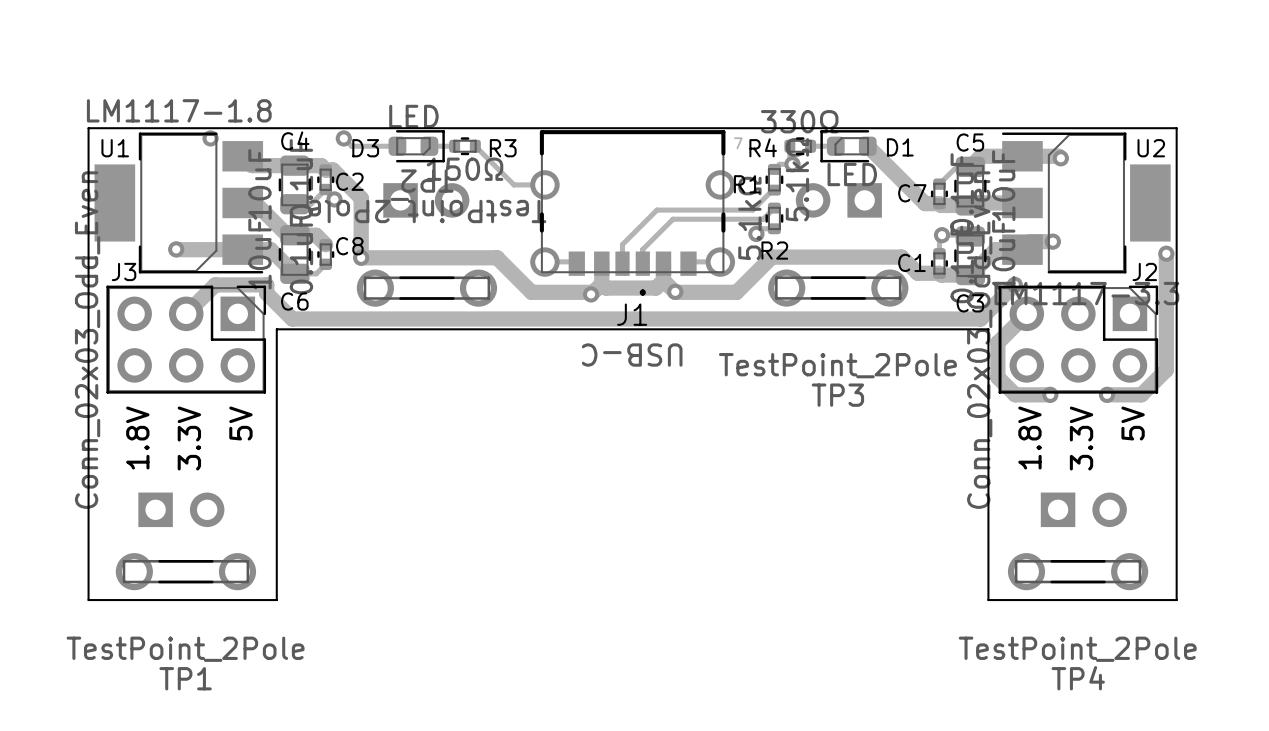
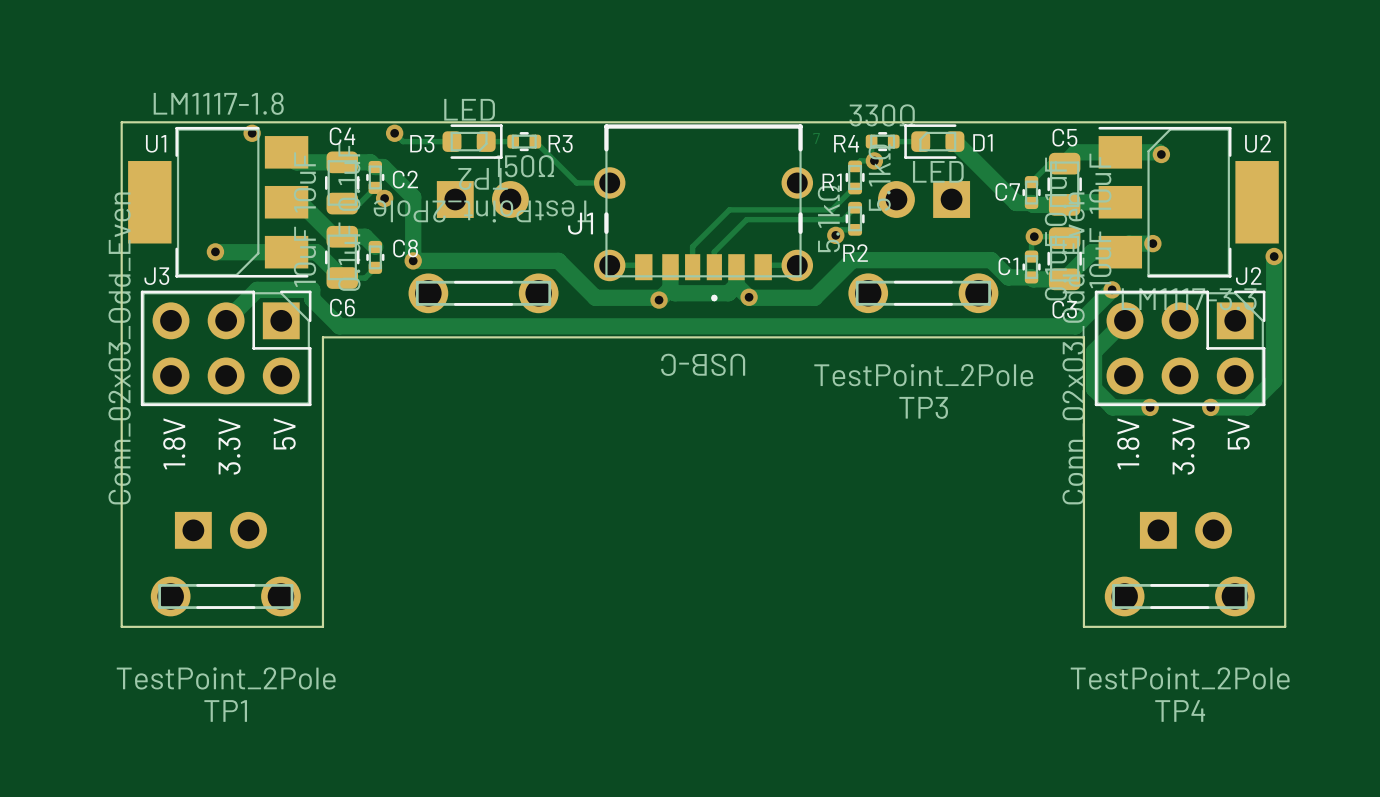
J1 name position: J1 (632, 314) -> J1 (580, 223)

